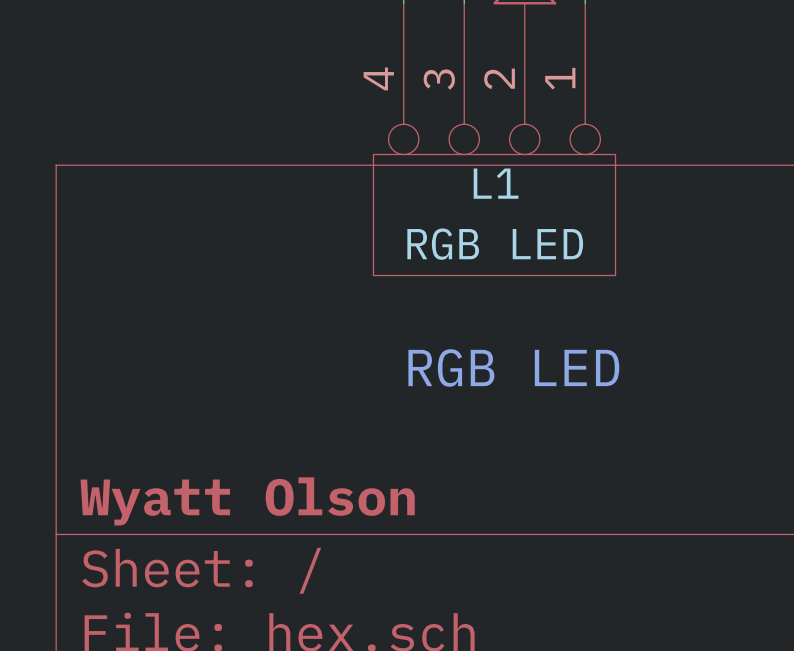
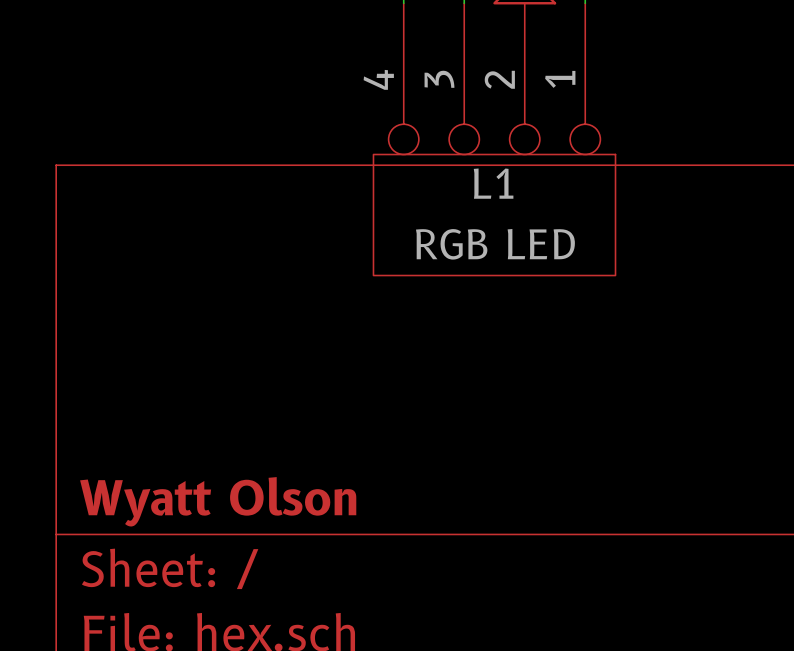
text: RGB LED (513, 367) -> none

